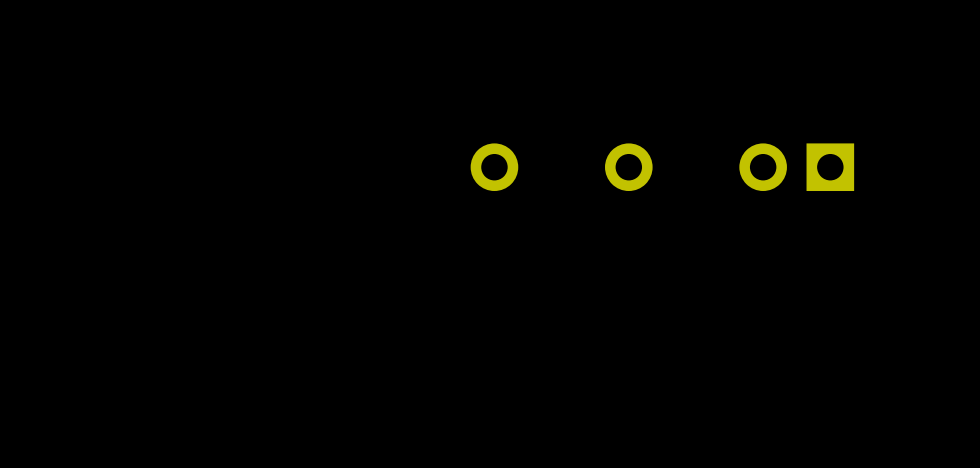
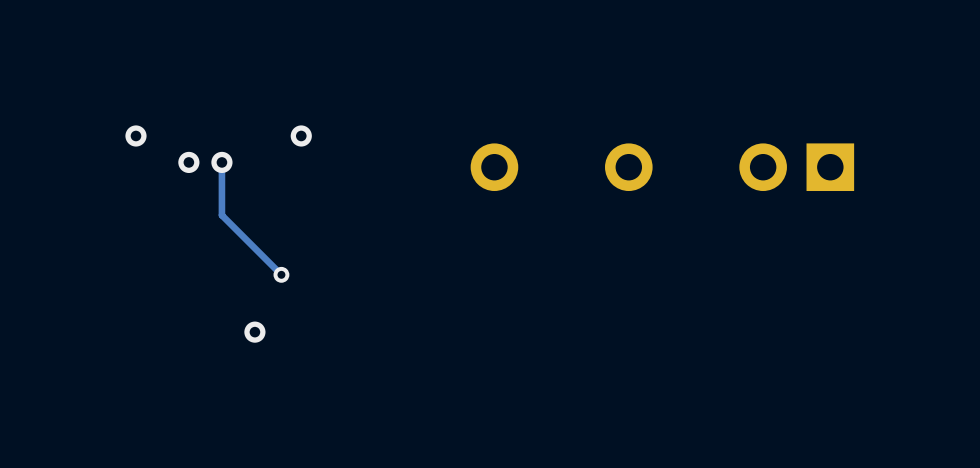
via: none -> (135, 135)
via: none -> (301, 135)
via: none -> (188, 162)
track: none -> (221, 162) (221, 215) (281, 274)
via: none -> (221, 162)
via: none -> (281, 274)
via: none -> (254, 332)

